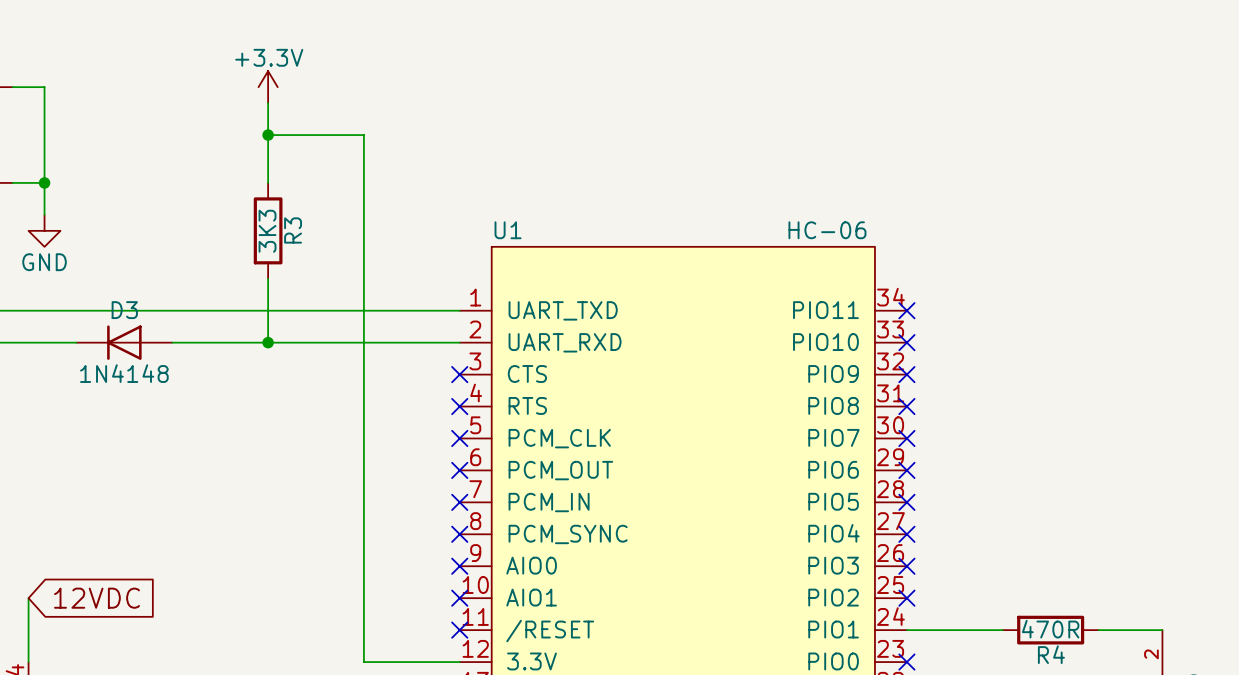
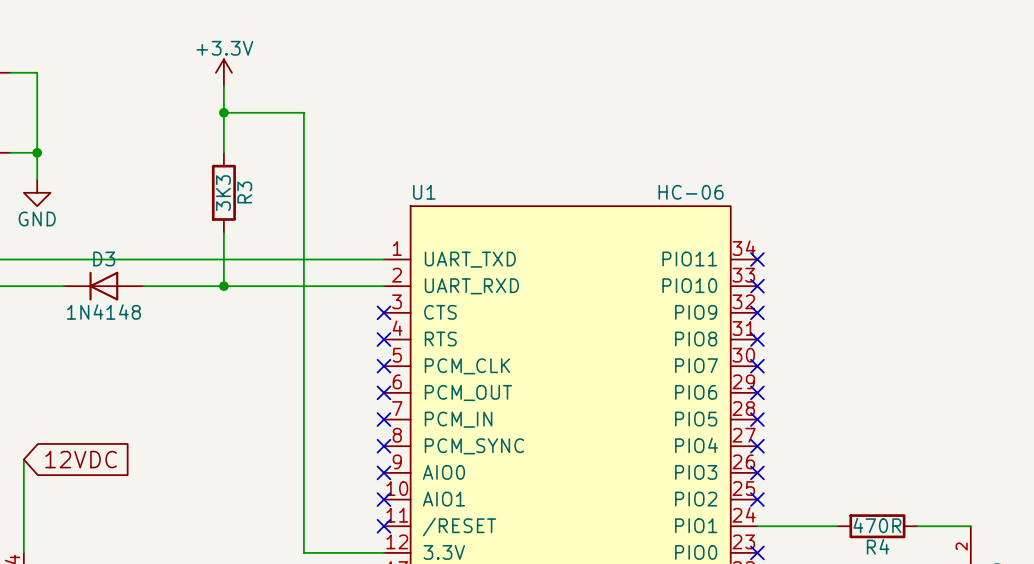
wire: none -> (23, 459) (23, 499)
global label position: 12VDC (97, 598) -> 12VDC (81, 459)

